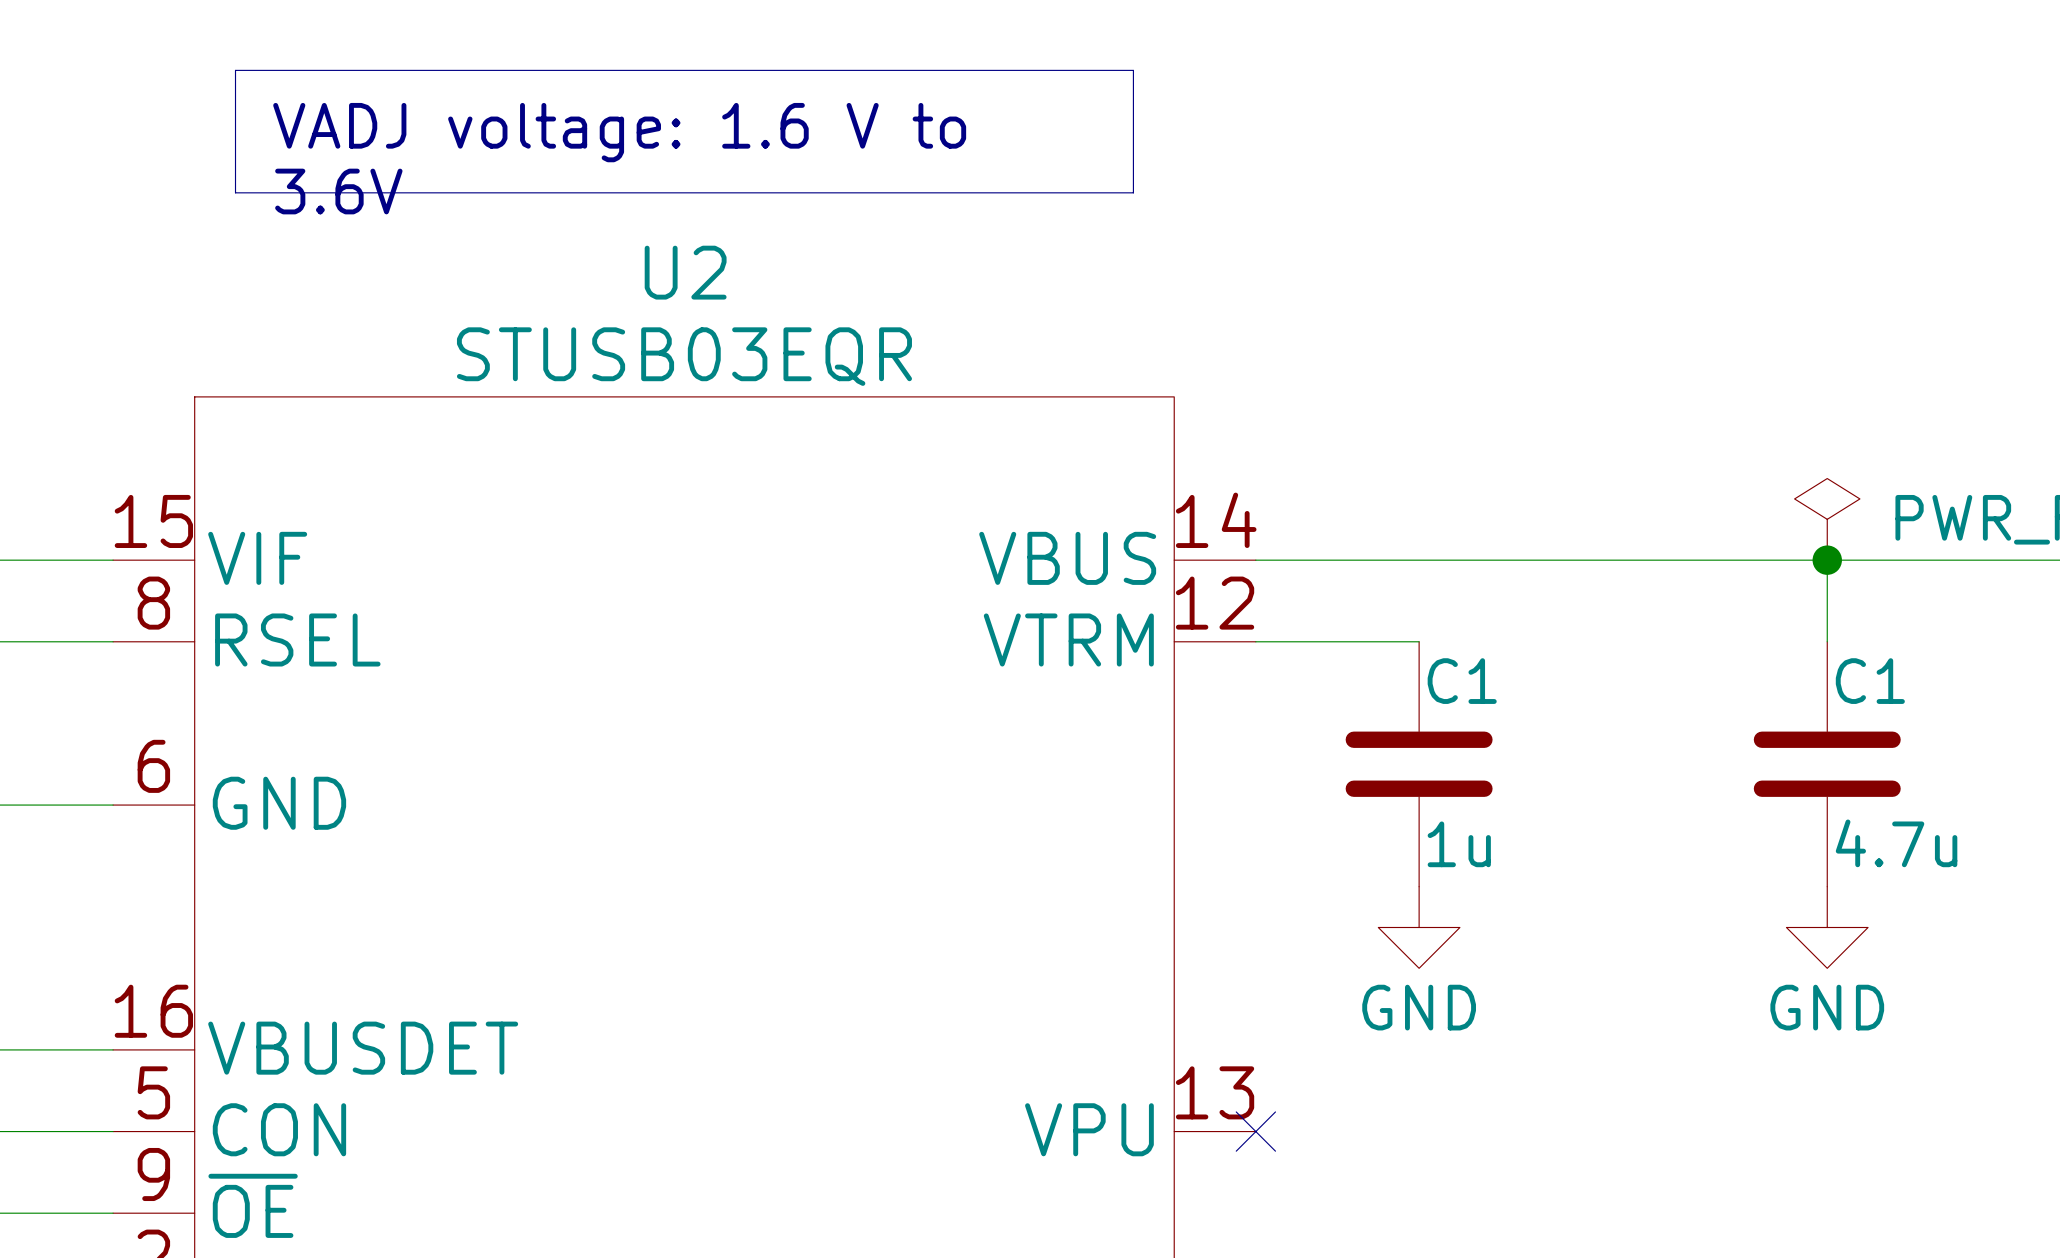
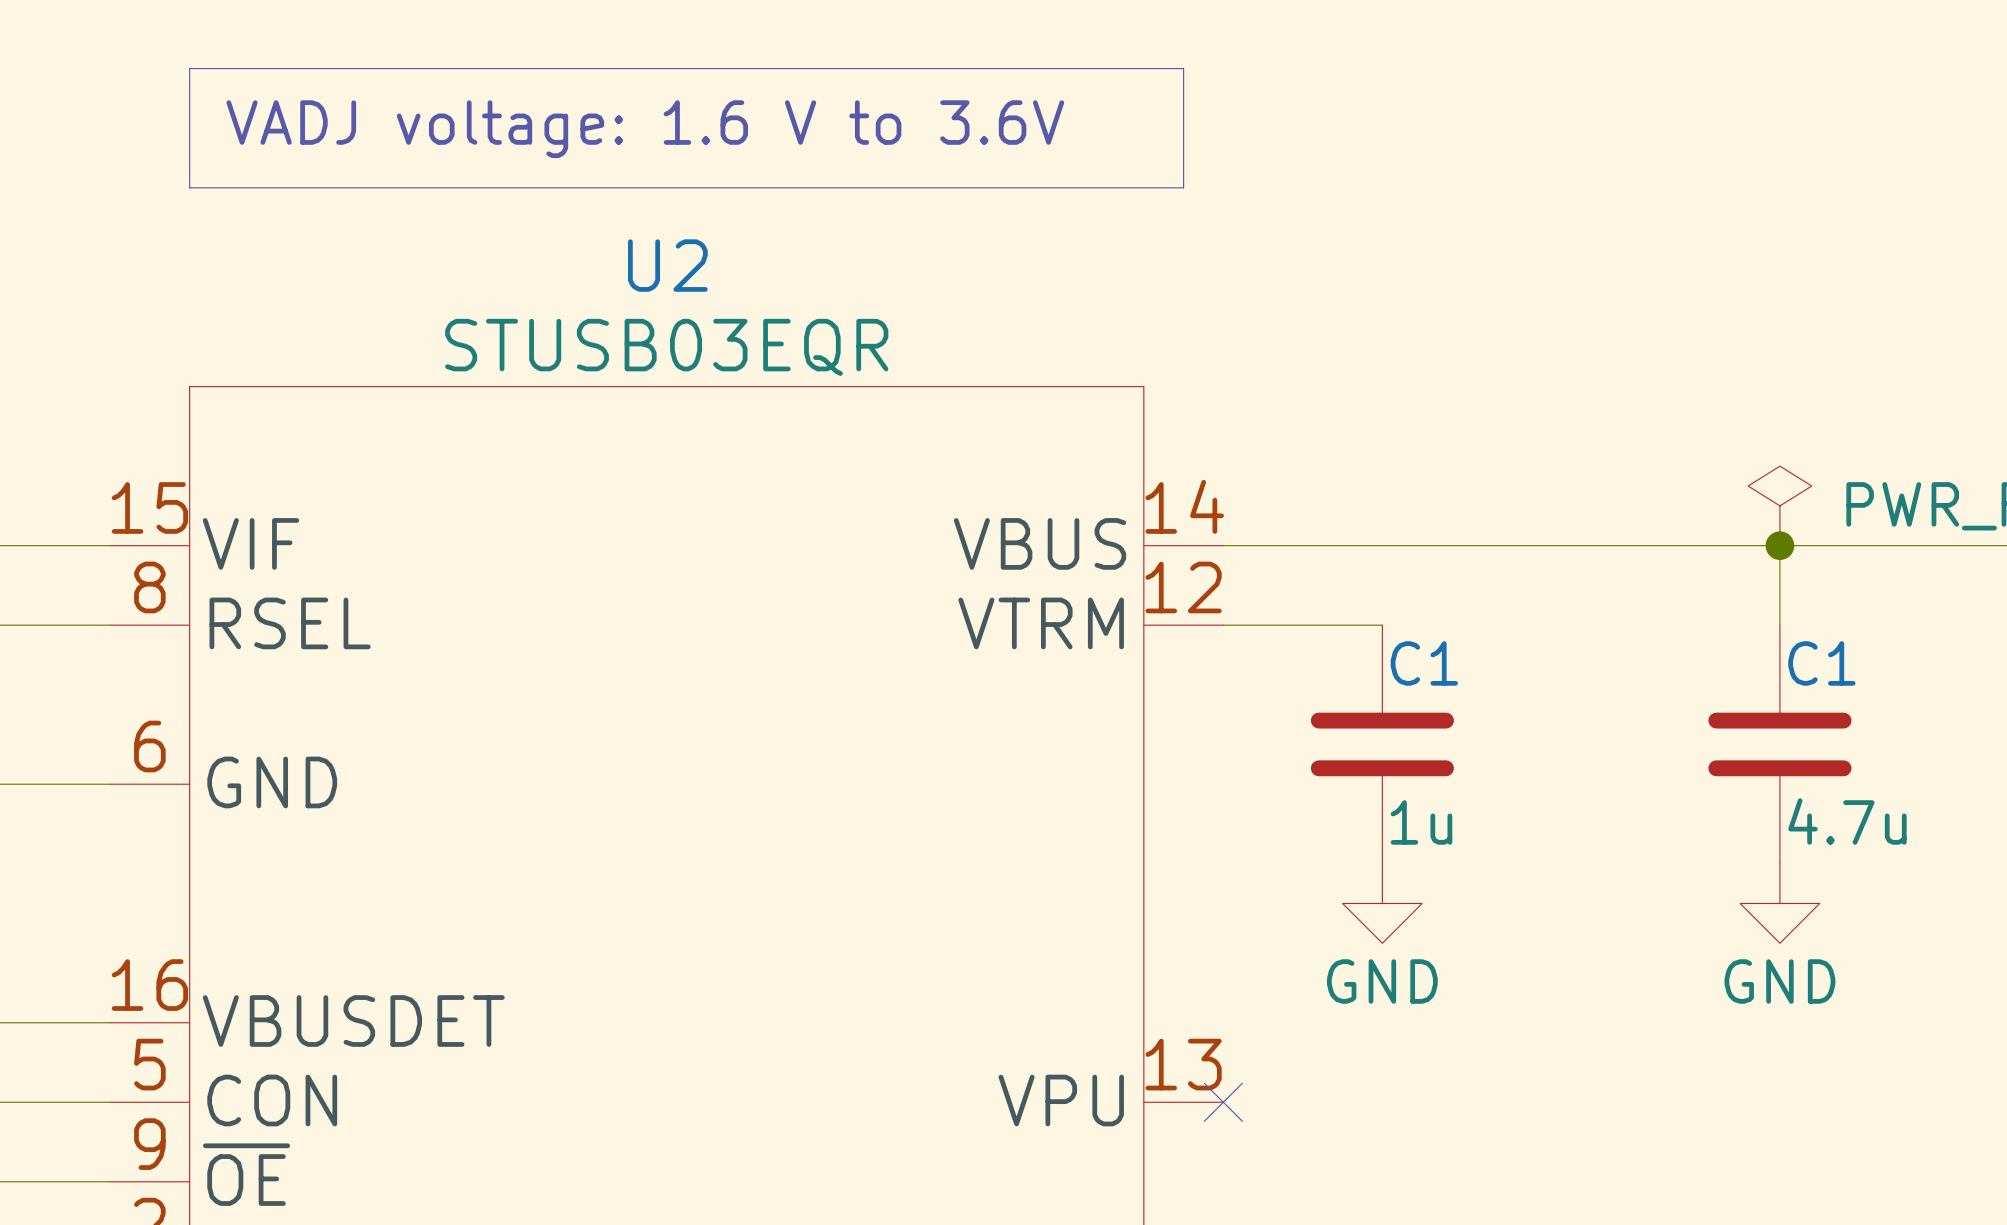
line: (235, 70) (235, 192) -> (229, 68) (189, 68) (189, 187) (229, 187)
line: (1133, 70) (1133, 192) -> (1104, 68) (1183, 68) (1183, 187) (1104, 187)
text: VADJ voltage: 1.6 V to (619, 132) -> VADJ voltage: 1.6 V to 3.6V (645, 129)
text: 3.6V (338, 191) -> none

